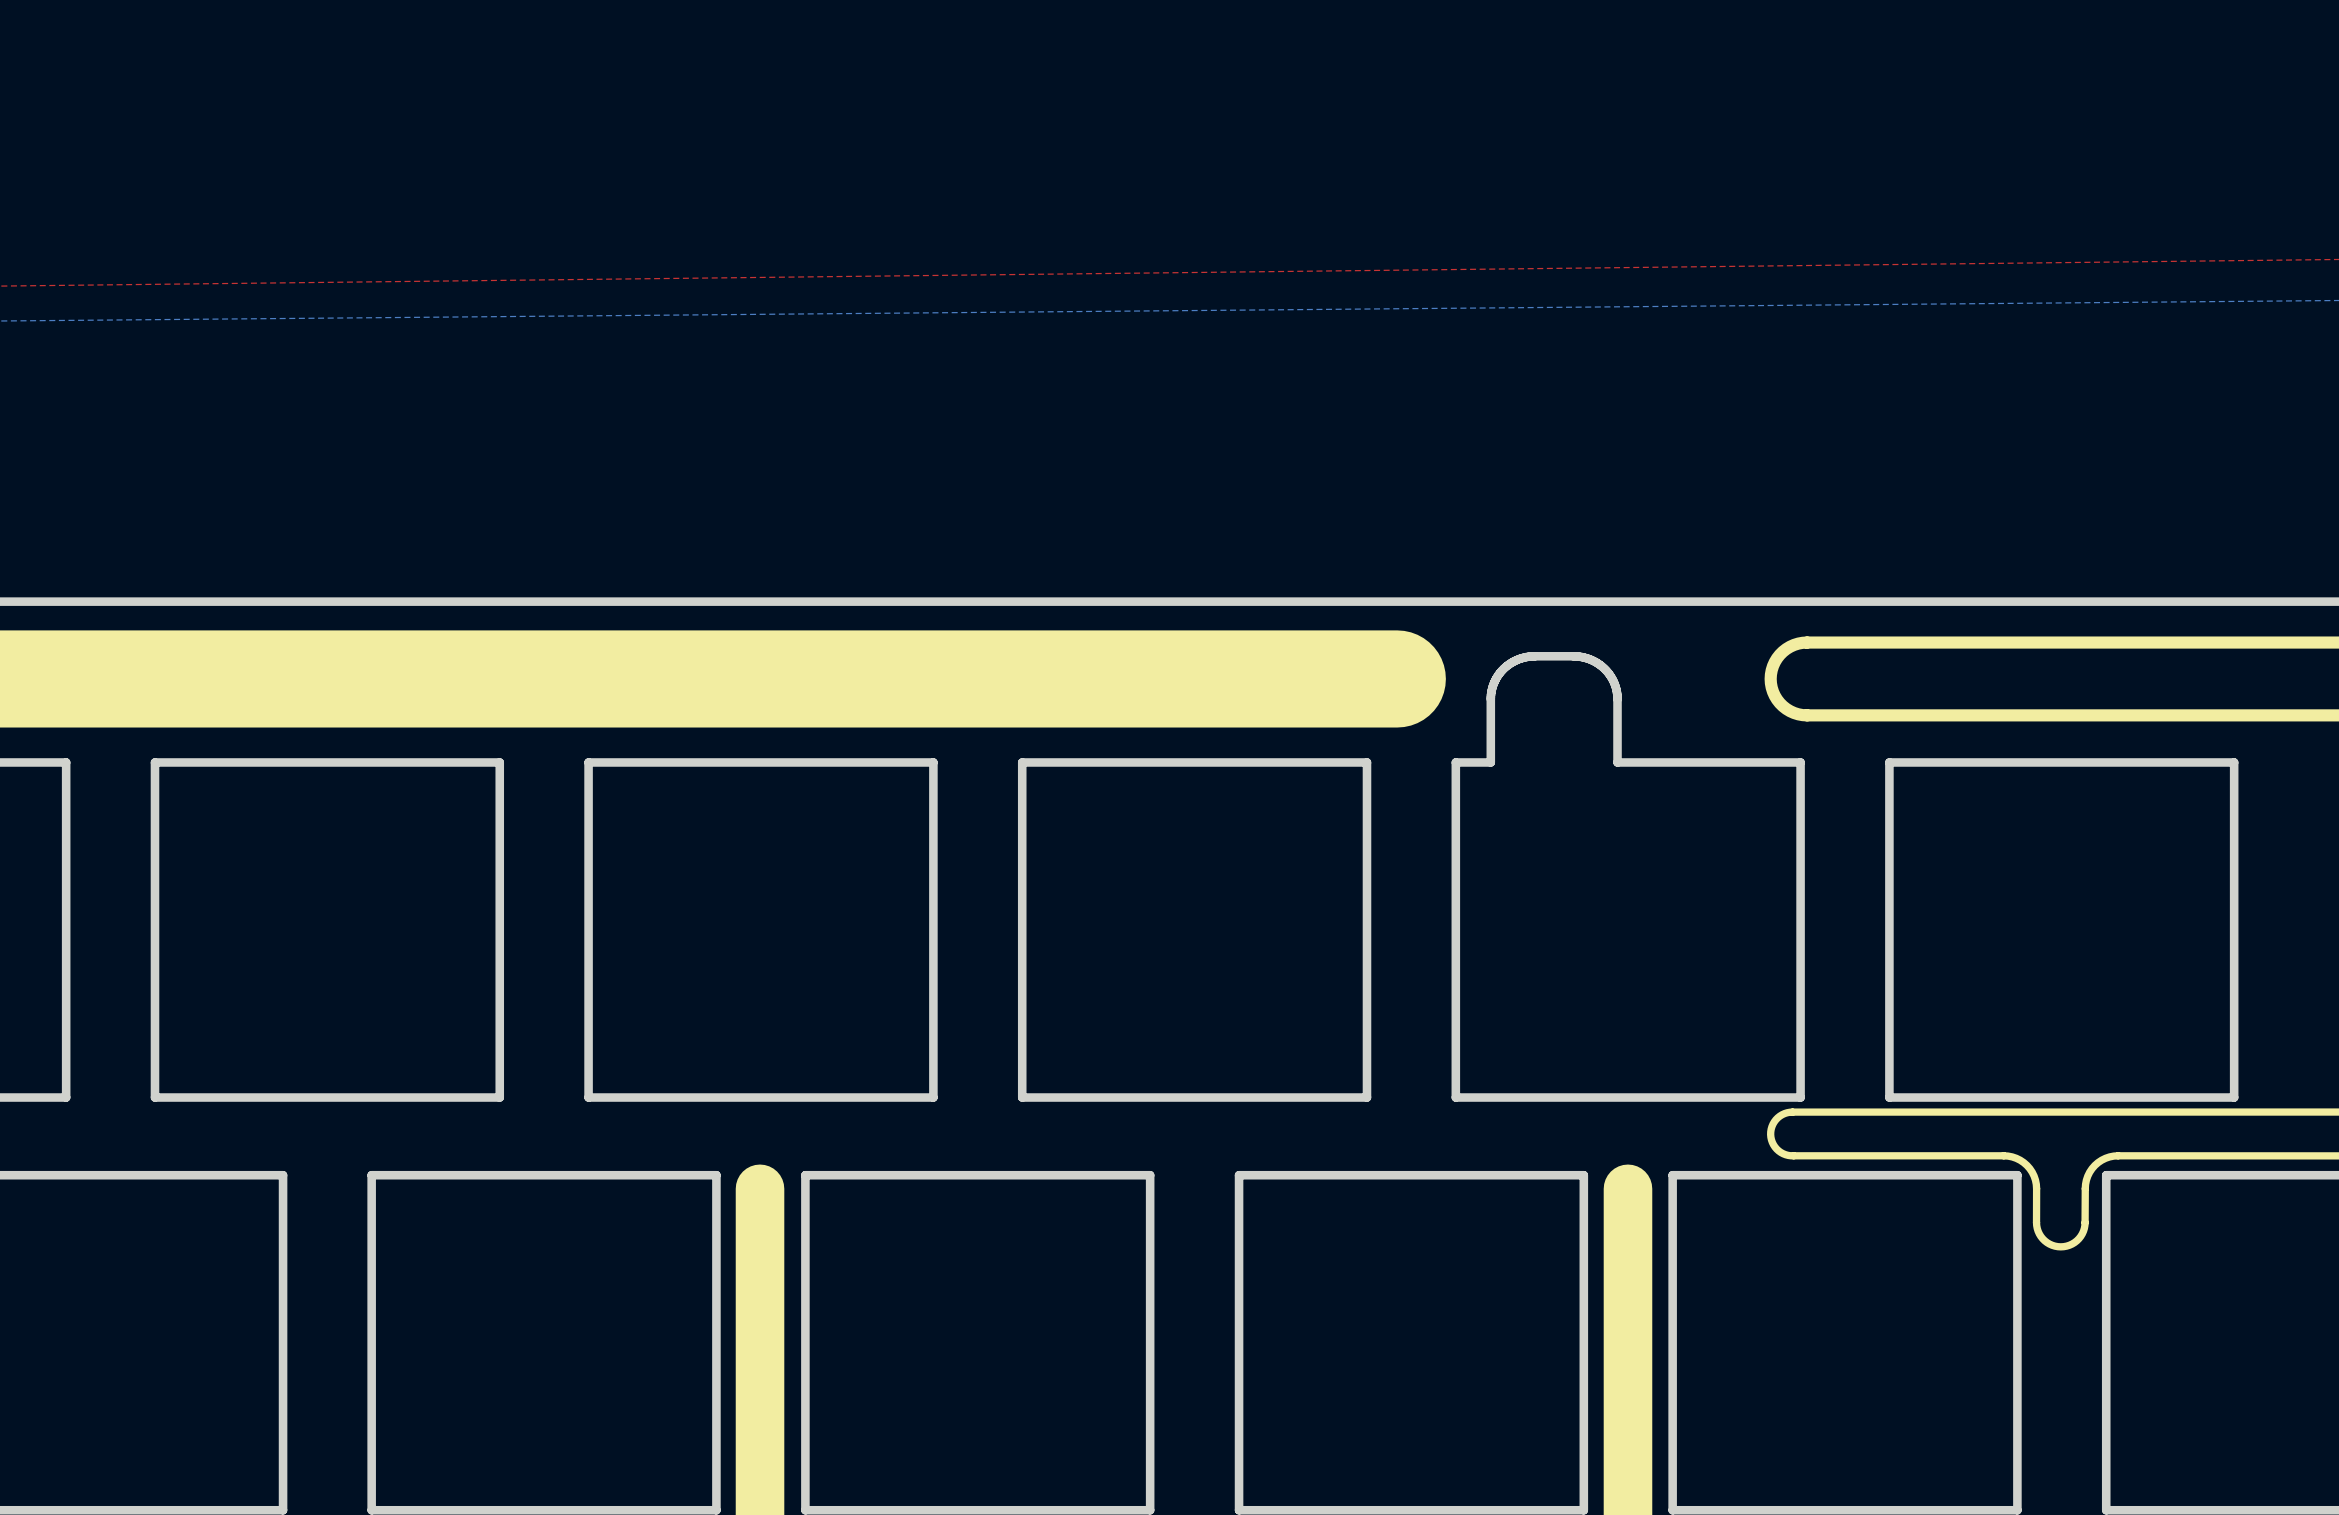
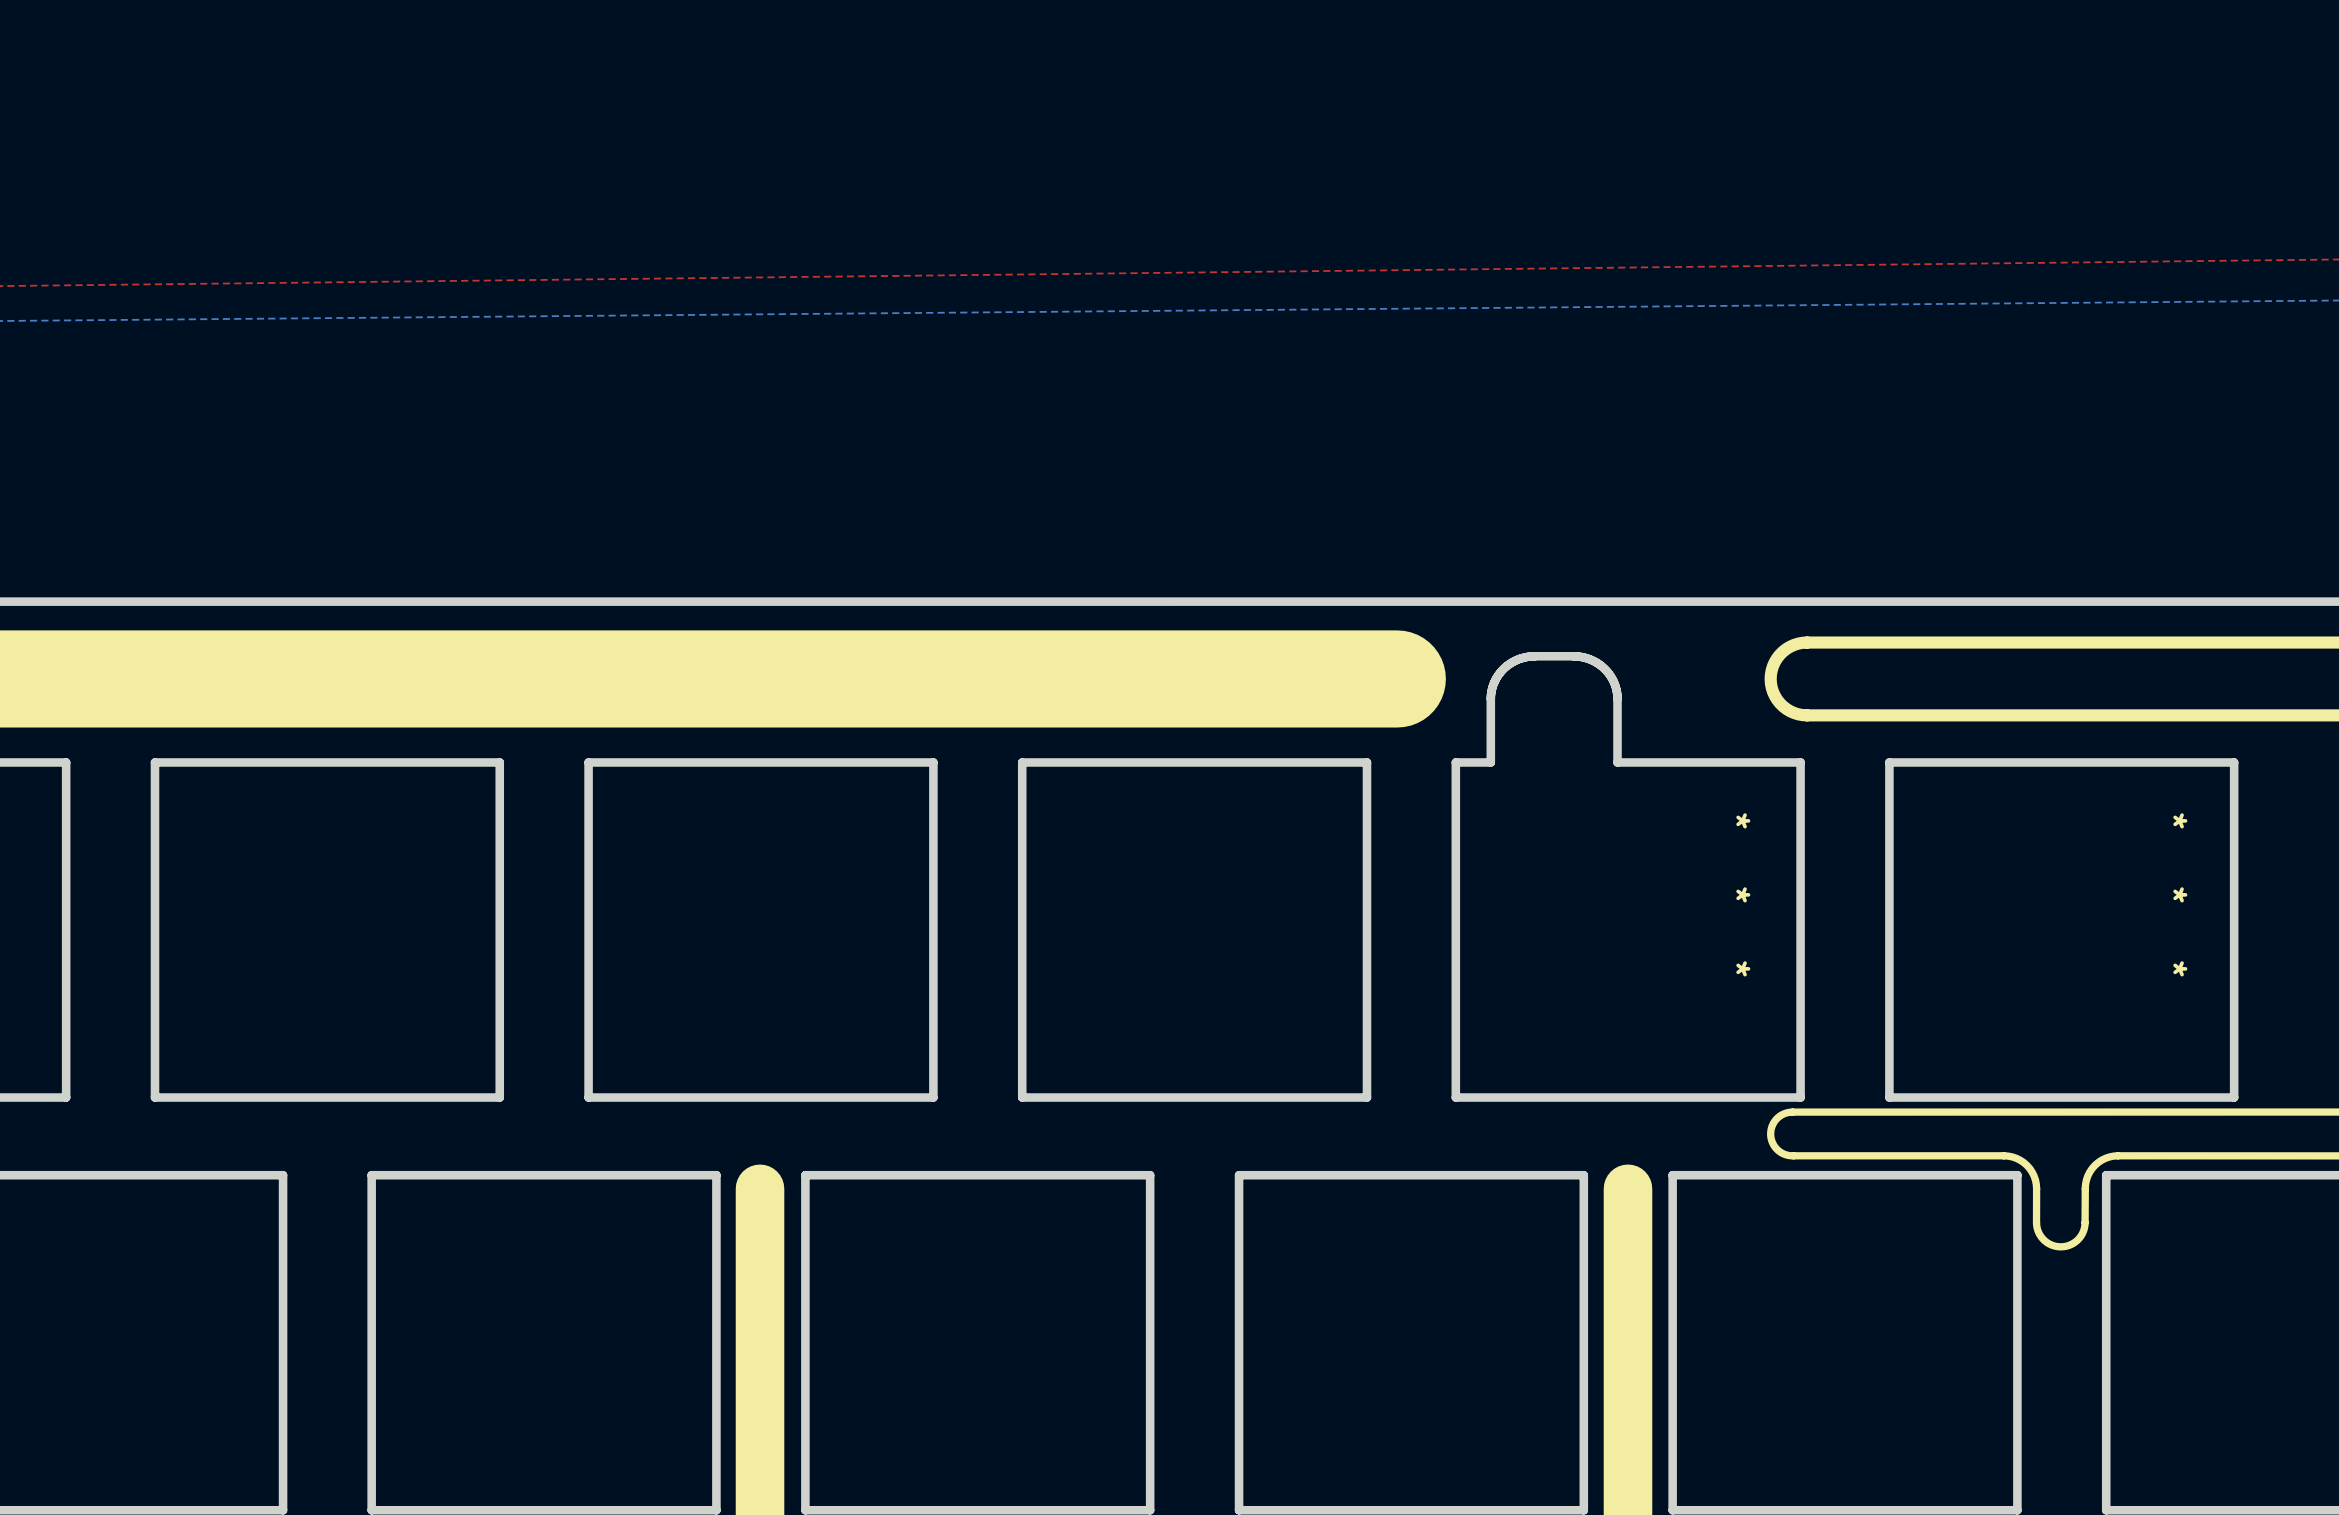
text: none -> * * * (1743, 894)
text: none -> * * * (2180, 894)

